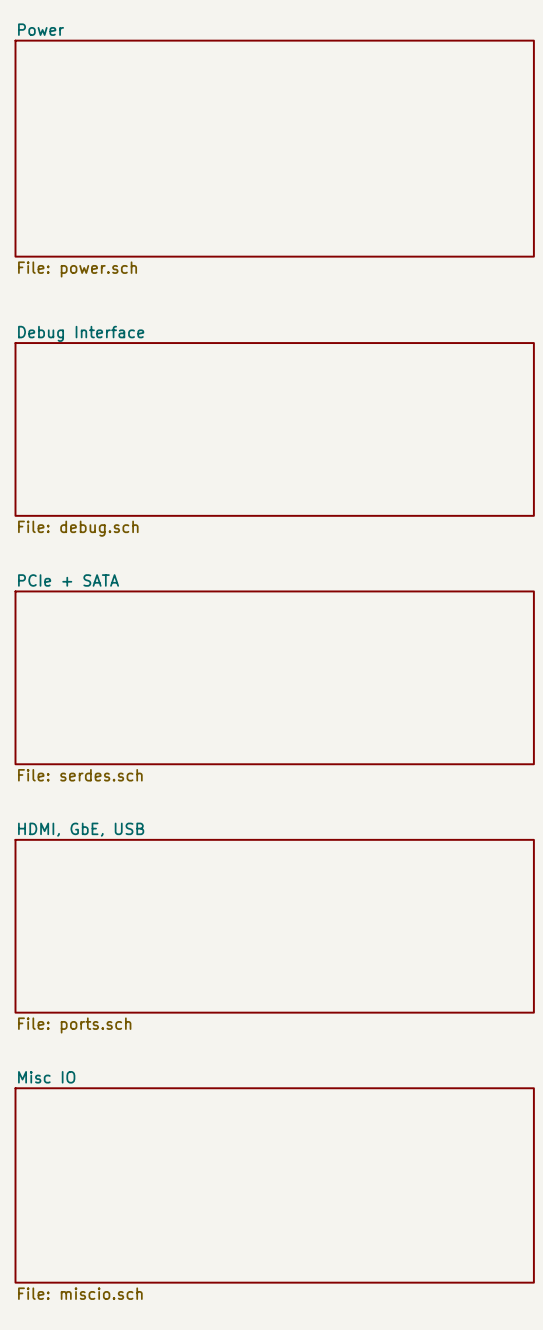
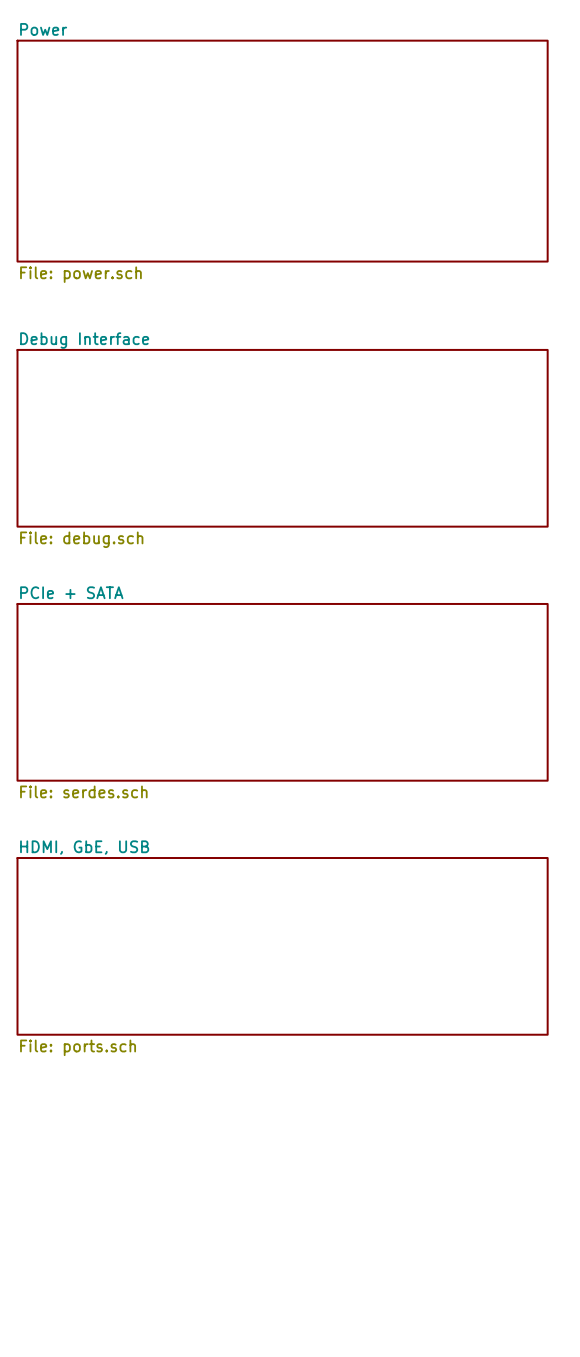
sheet Misc IO: File: miscio.sch (274, 1185) -> none

